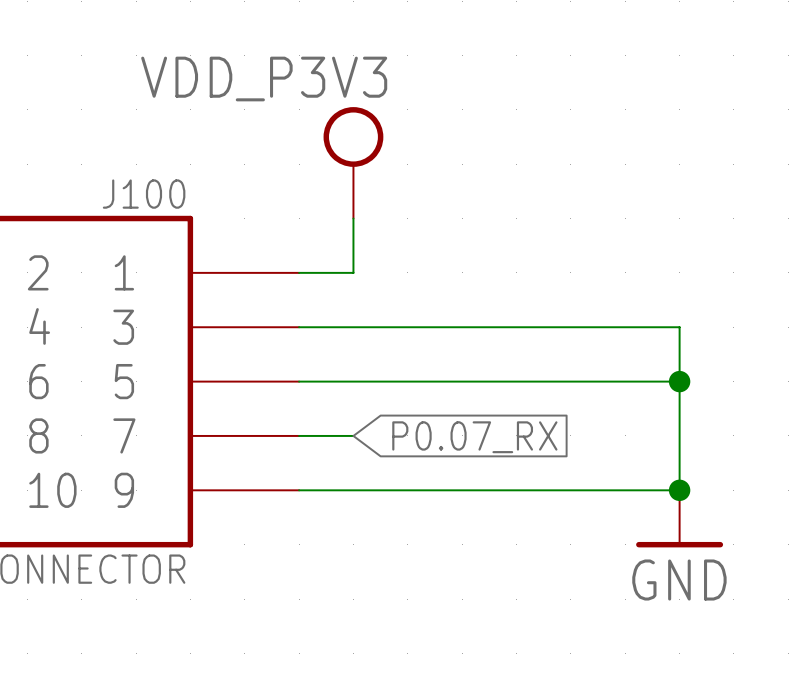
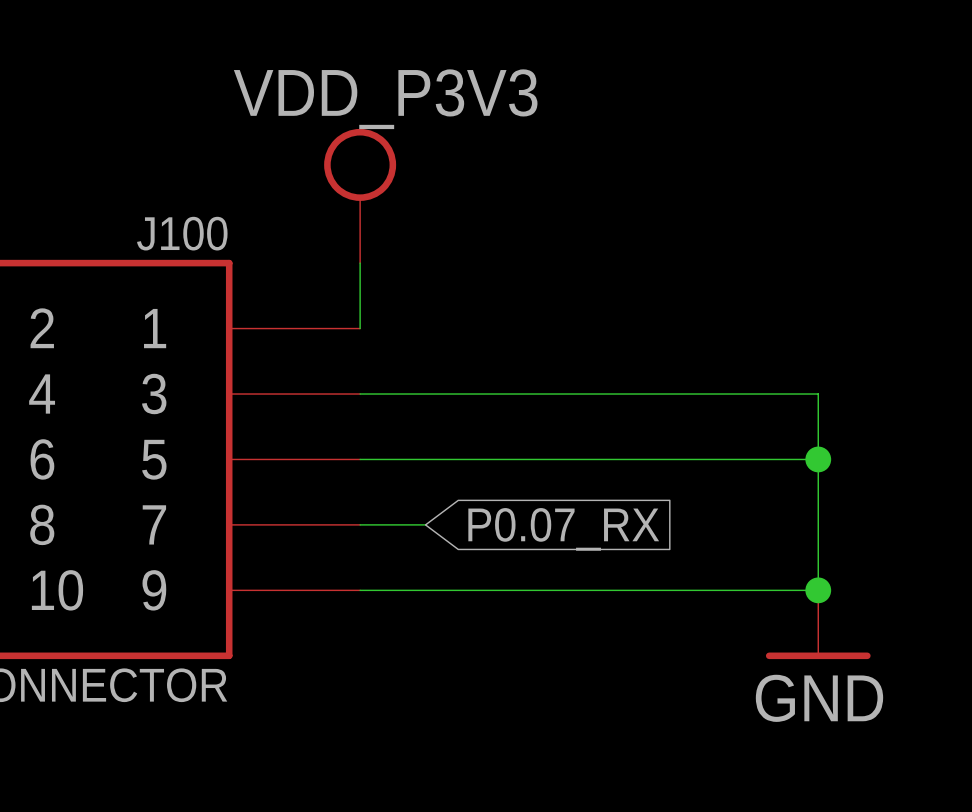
power symbol text position: VDD_P3V3 (264, 79) -> VDD_P3V3 (385, 99)
power symbol position: VDD_P3V3 (353, 162) -> VDD_P3V3 (360, 196)
wire: (353, 218) (353, 272) (299, 272) -> (360, 263) (360, 328)

